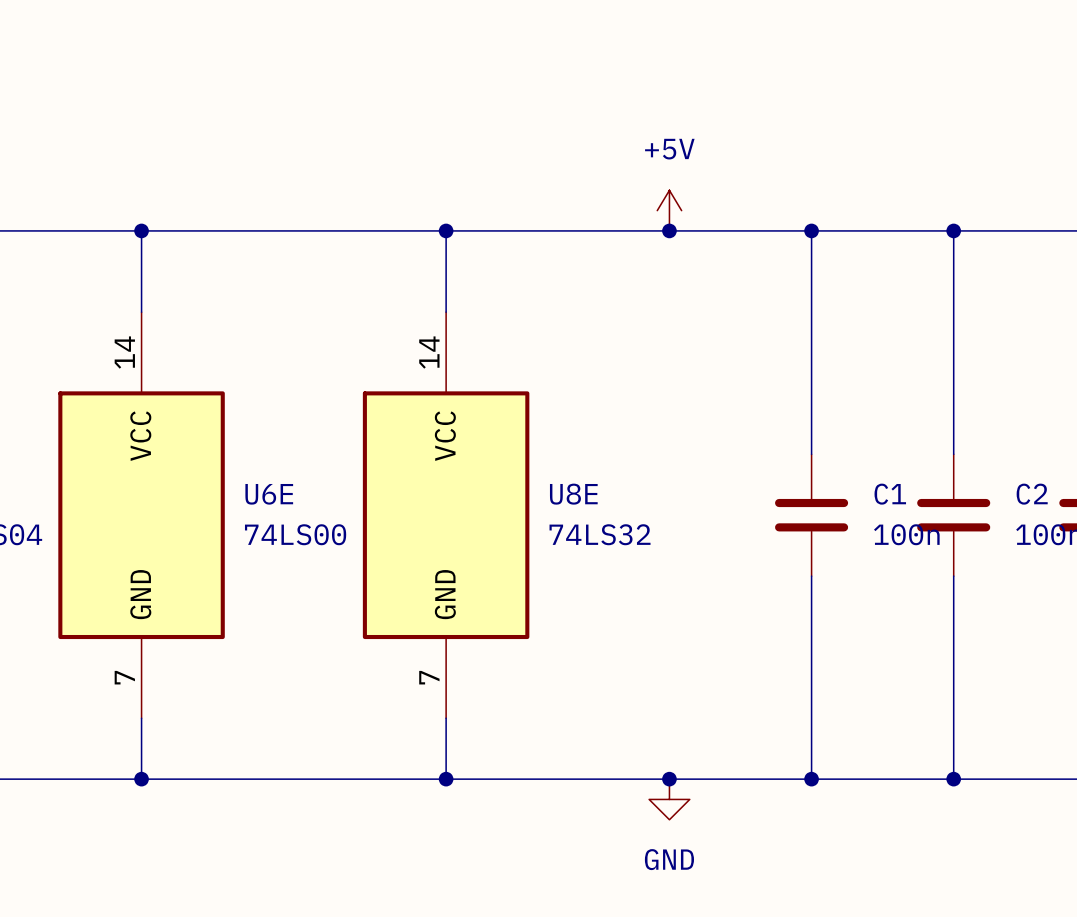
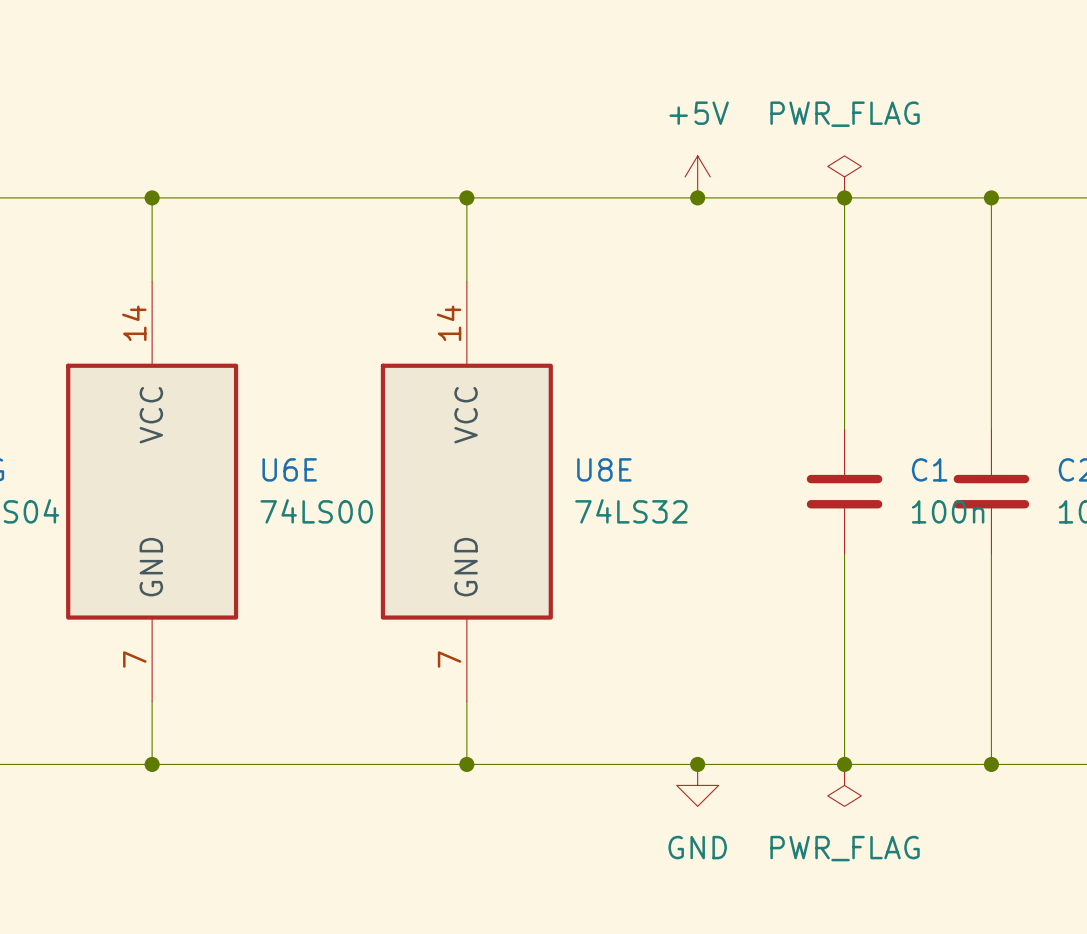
power symbol: none -> PWR_FLAG (844, 176)
power symbol: none -> PWR_FLAG (844, 785)

